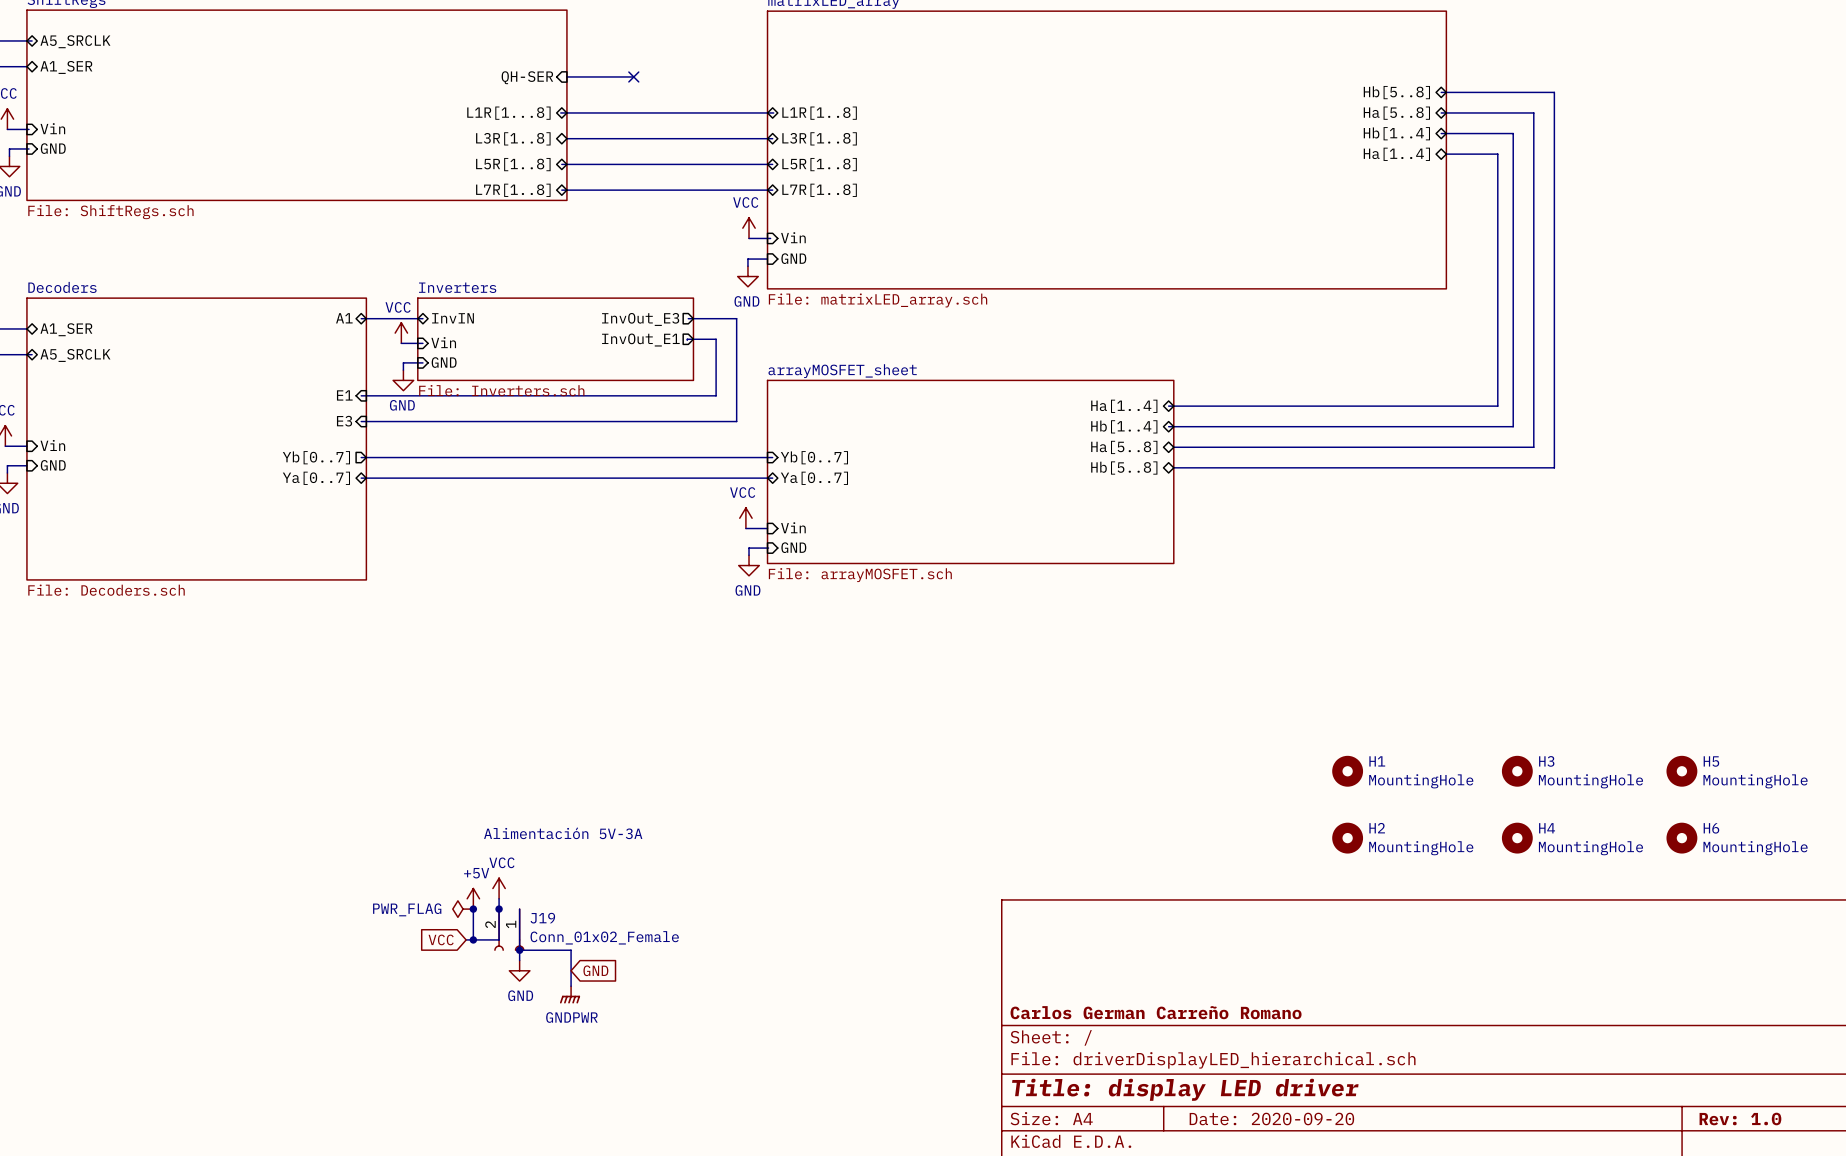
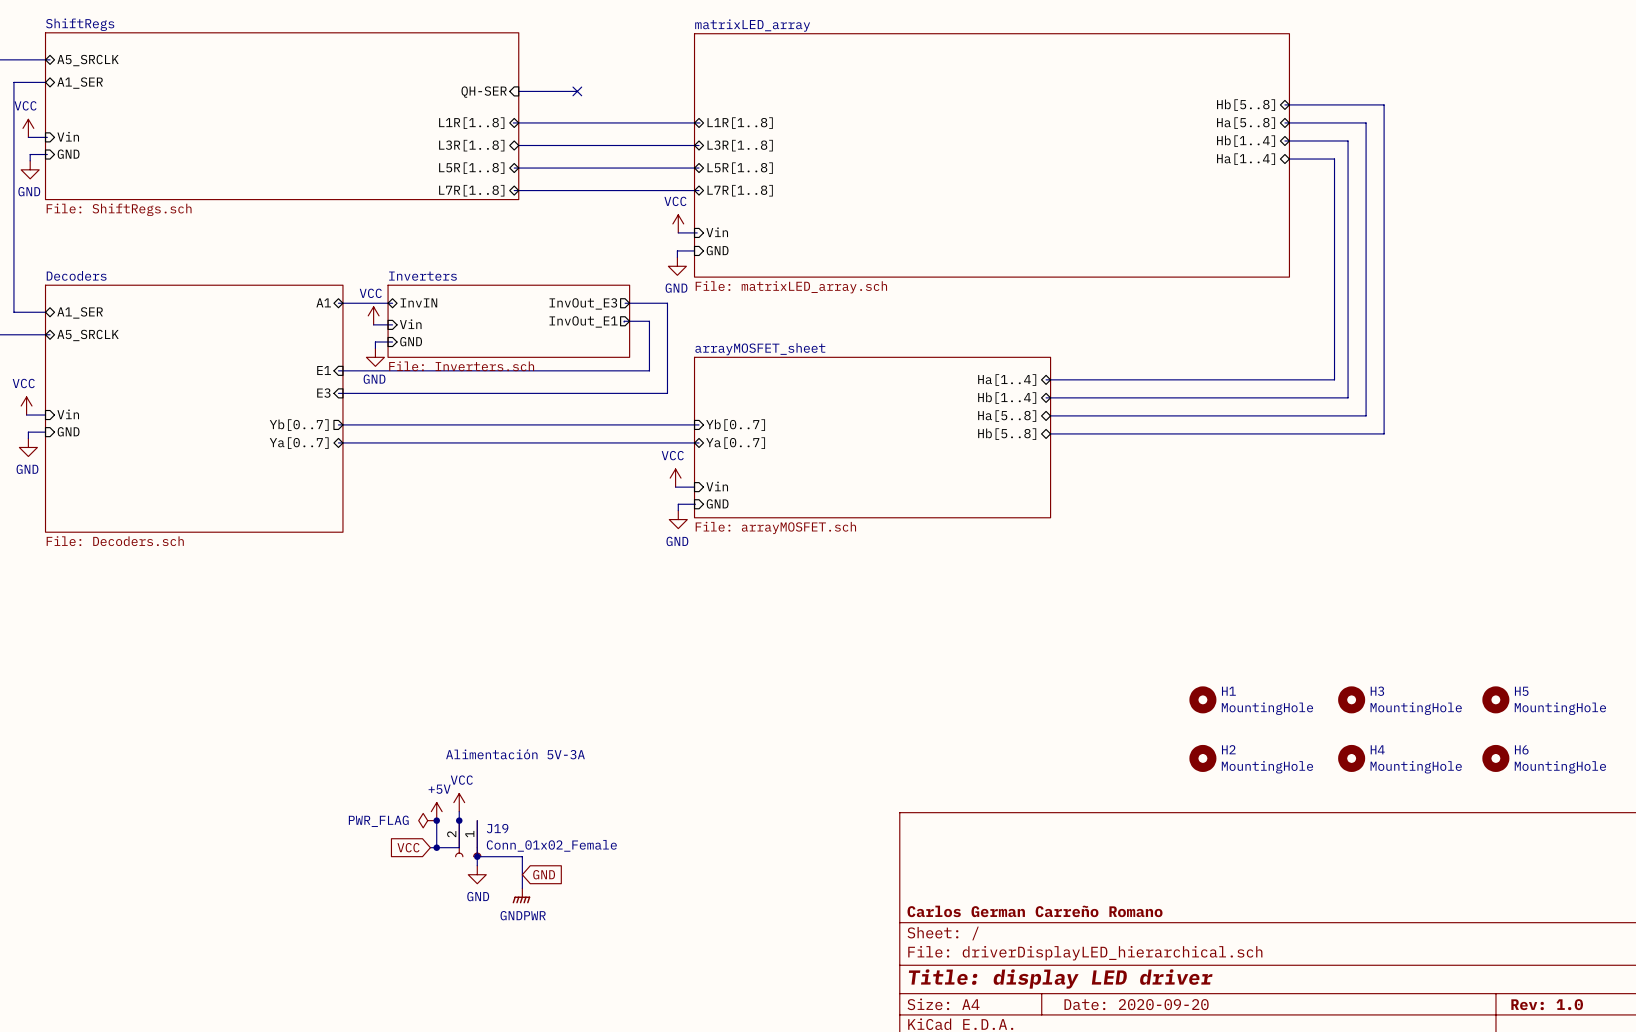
sheet pin: L1R[1...8] (508, 113) -> L1R[1..8] (471, 123)

